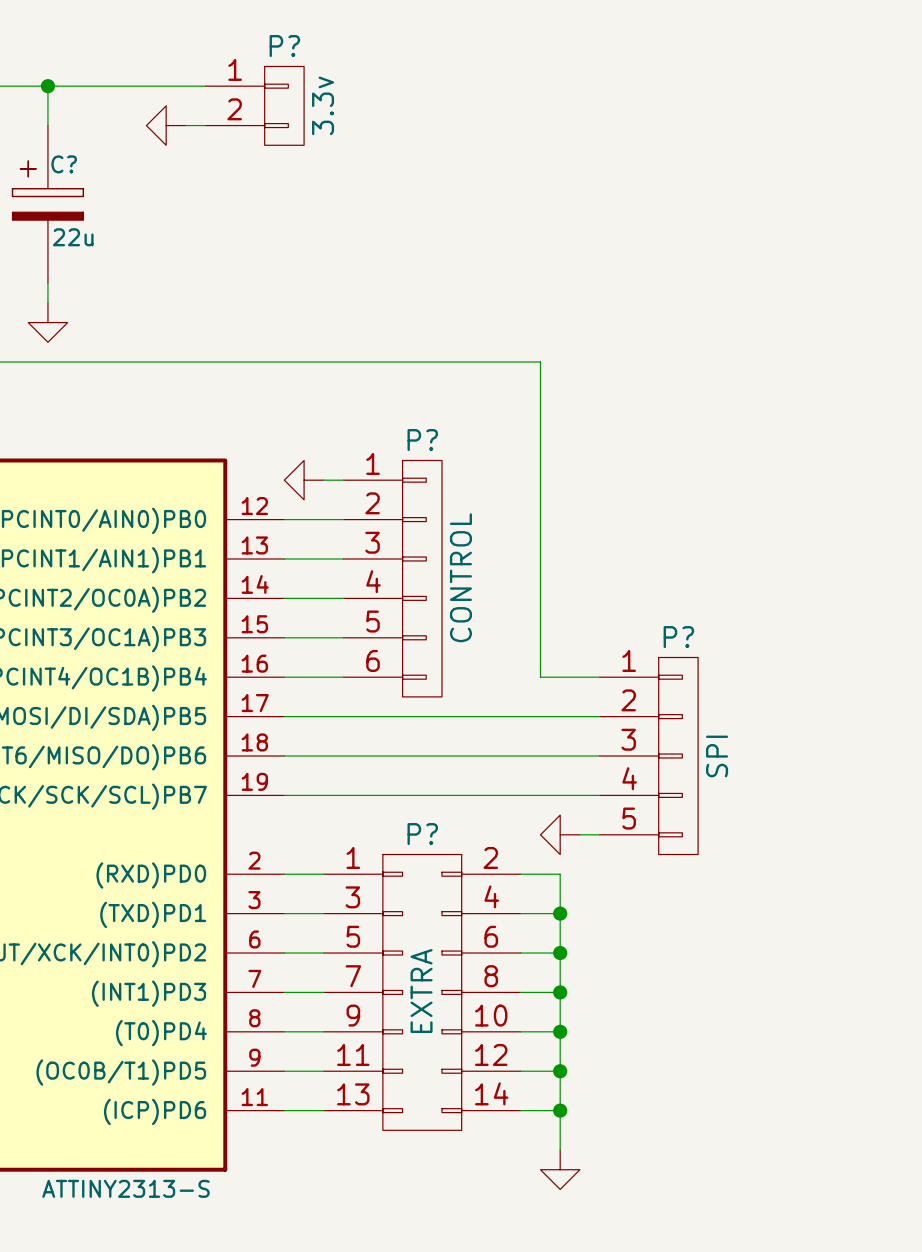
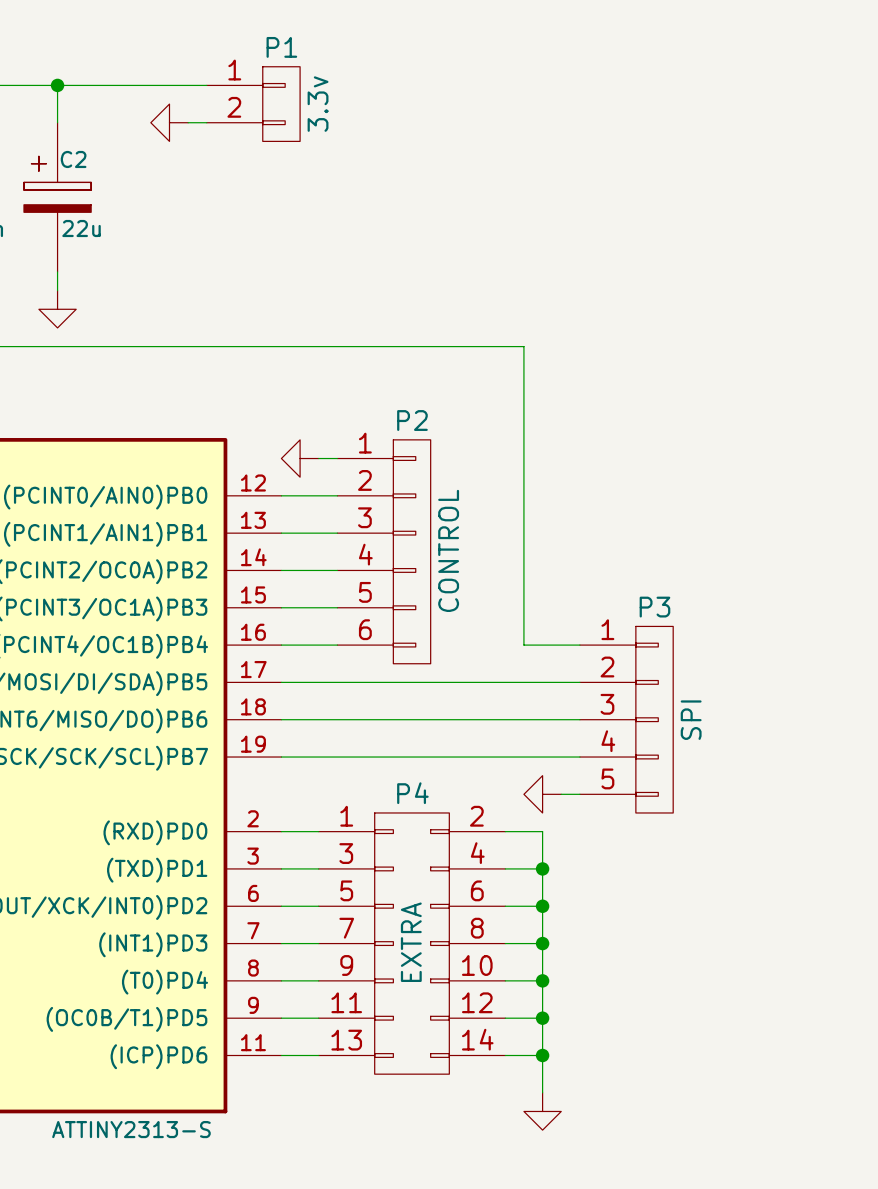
P? name: P? (284, 46) -> P1 (281, 47)
C? name: C? (64, 164) -> C2 (73, 159)
P? name: P? (422, 440) -> P2 (412, 420)
P? name: P? (678, 637) -> P3 (654, 607)
P? name: P? (422, 834) -> P4 (412, 793)

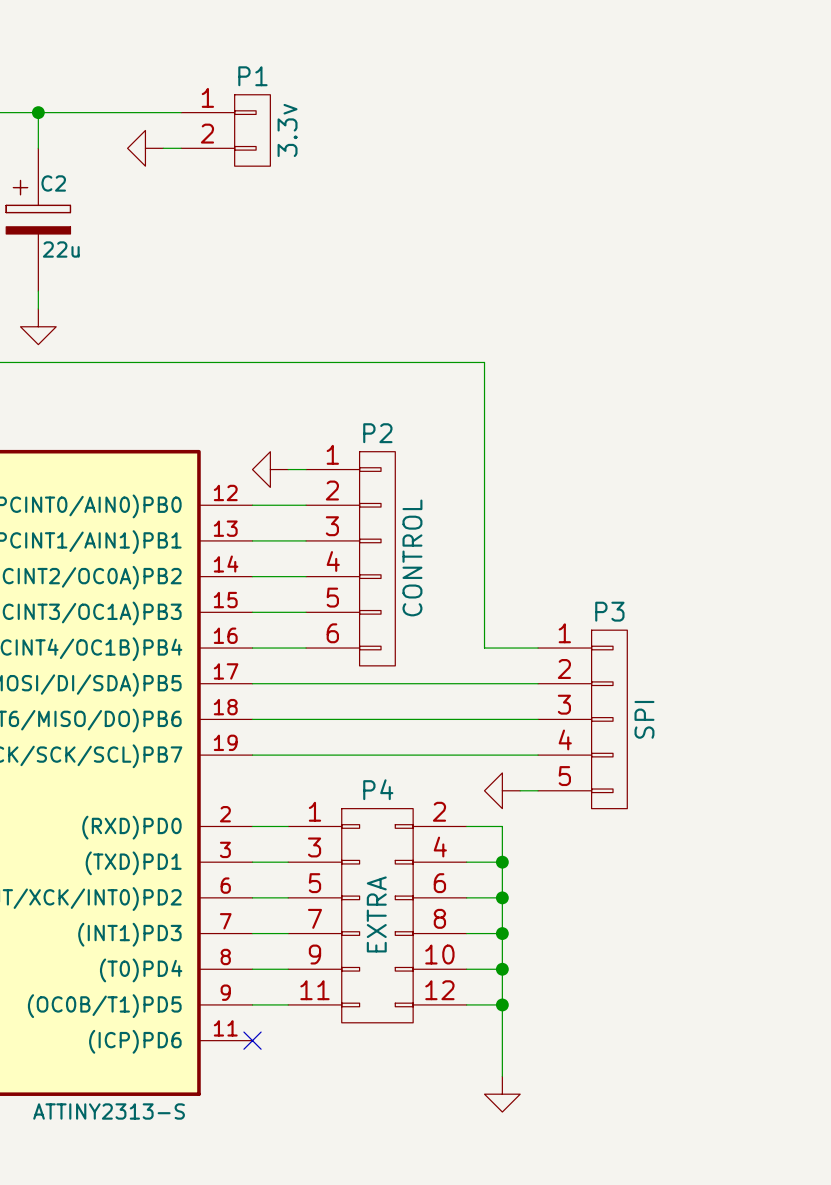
P4 symbol: [318, 812, 506, 1075] -> [288, 808, 467, 1023]
wire: (281, 1055) (318, 1055) -> none
no-connect mark: none -> (252, 1040)
wire: (505, 1055) (542, 1055) -> none
junction: (542, 1055) -> none

